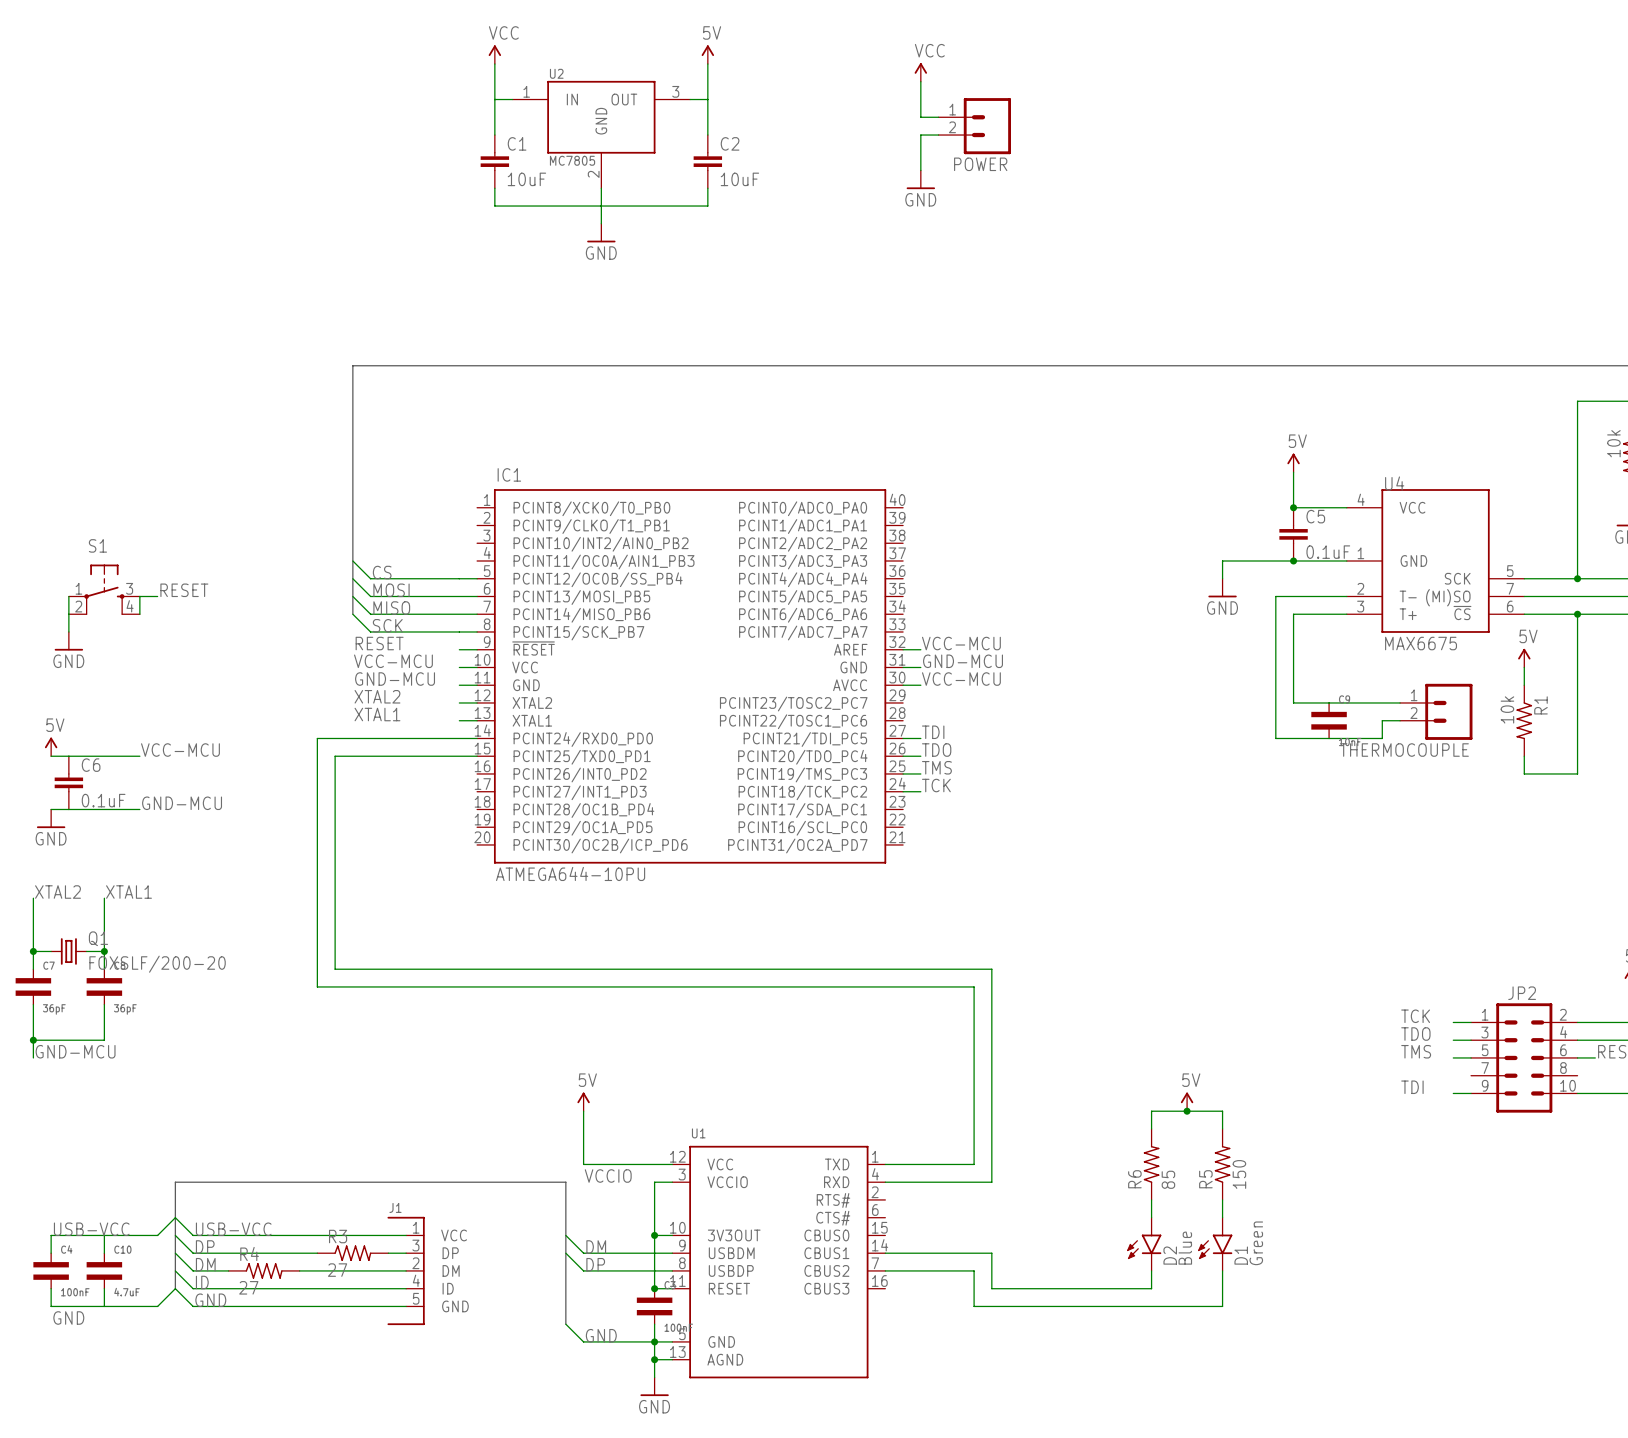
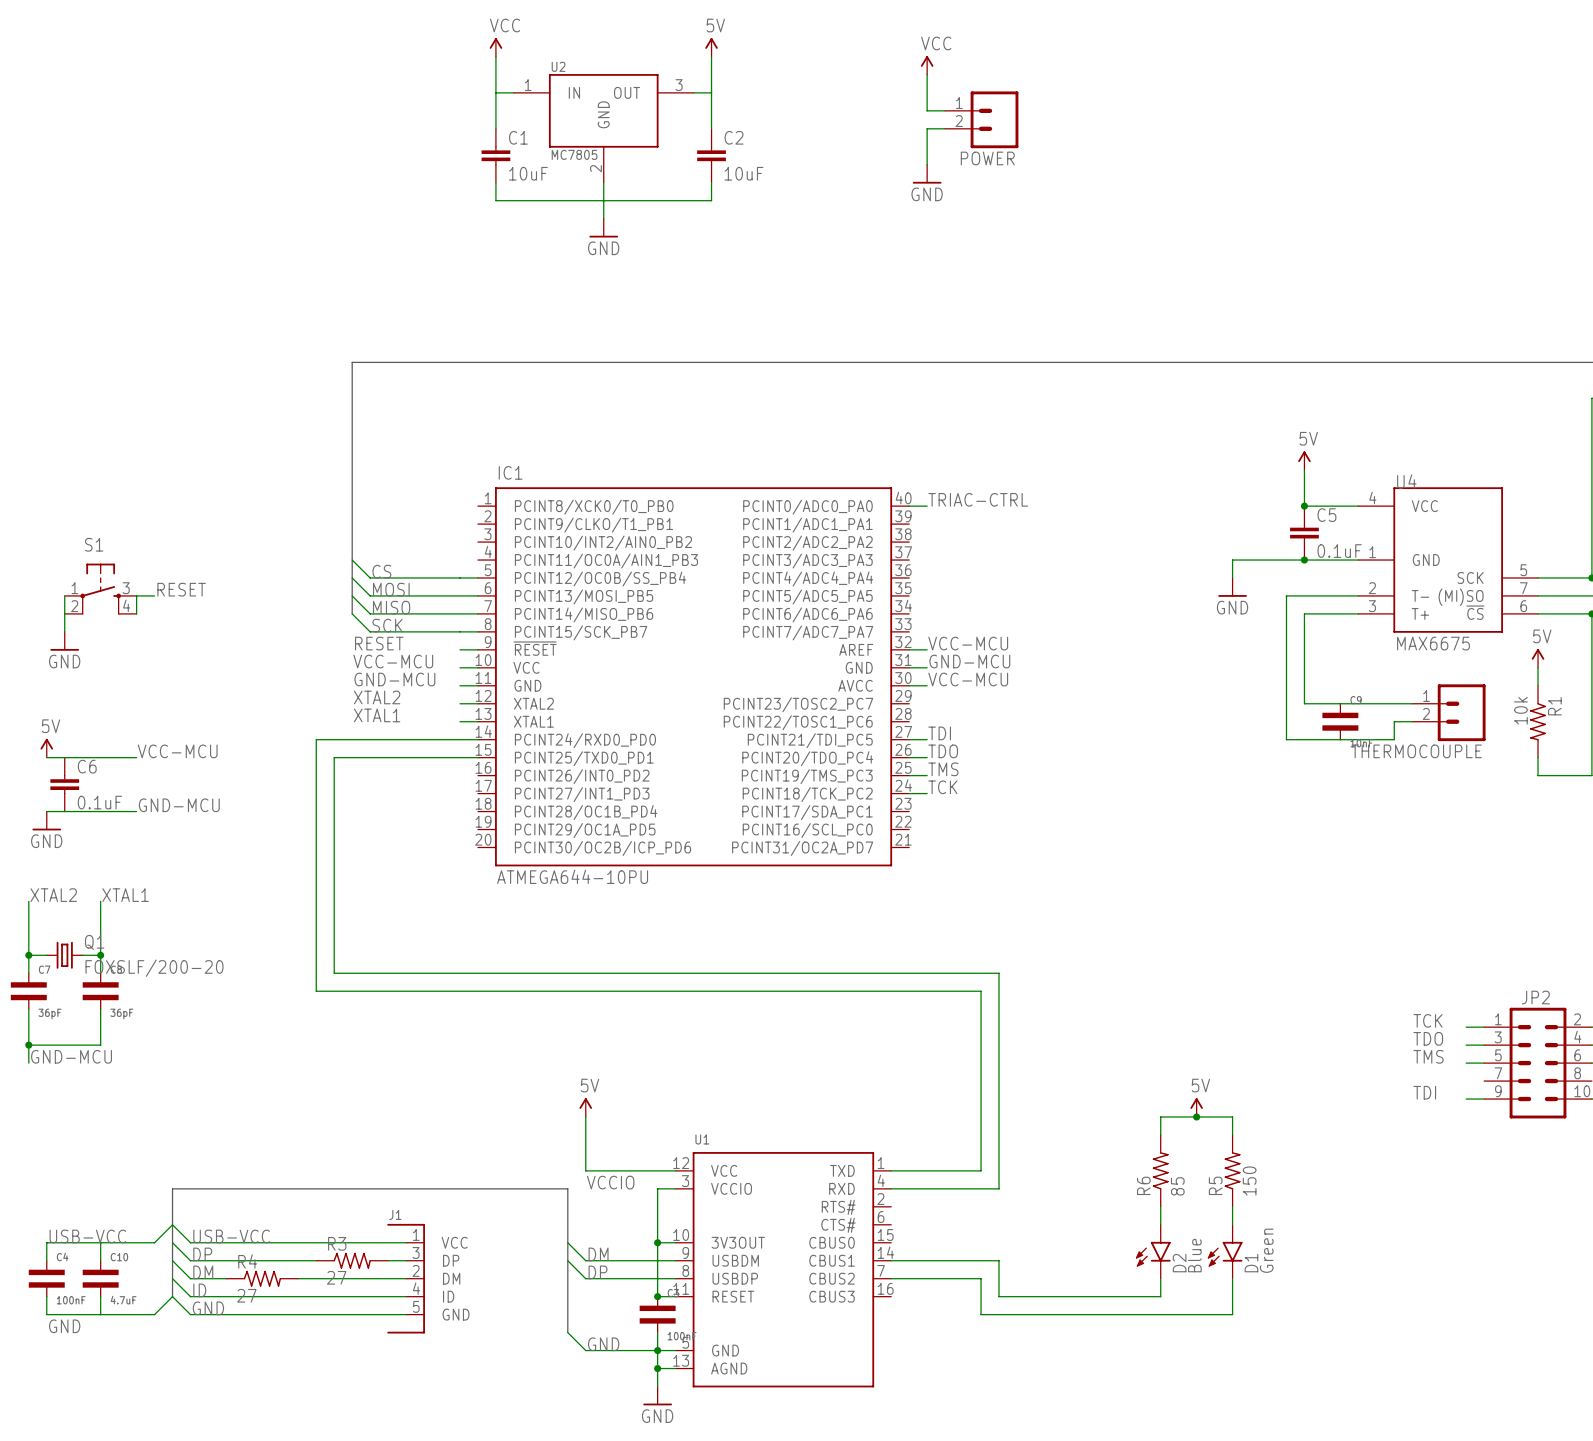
label: none -> TRIAC-CTRL (978, 499)
wire: none -> (909, 506) (927, 506)

